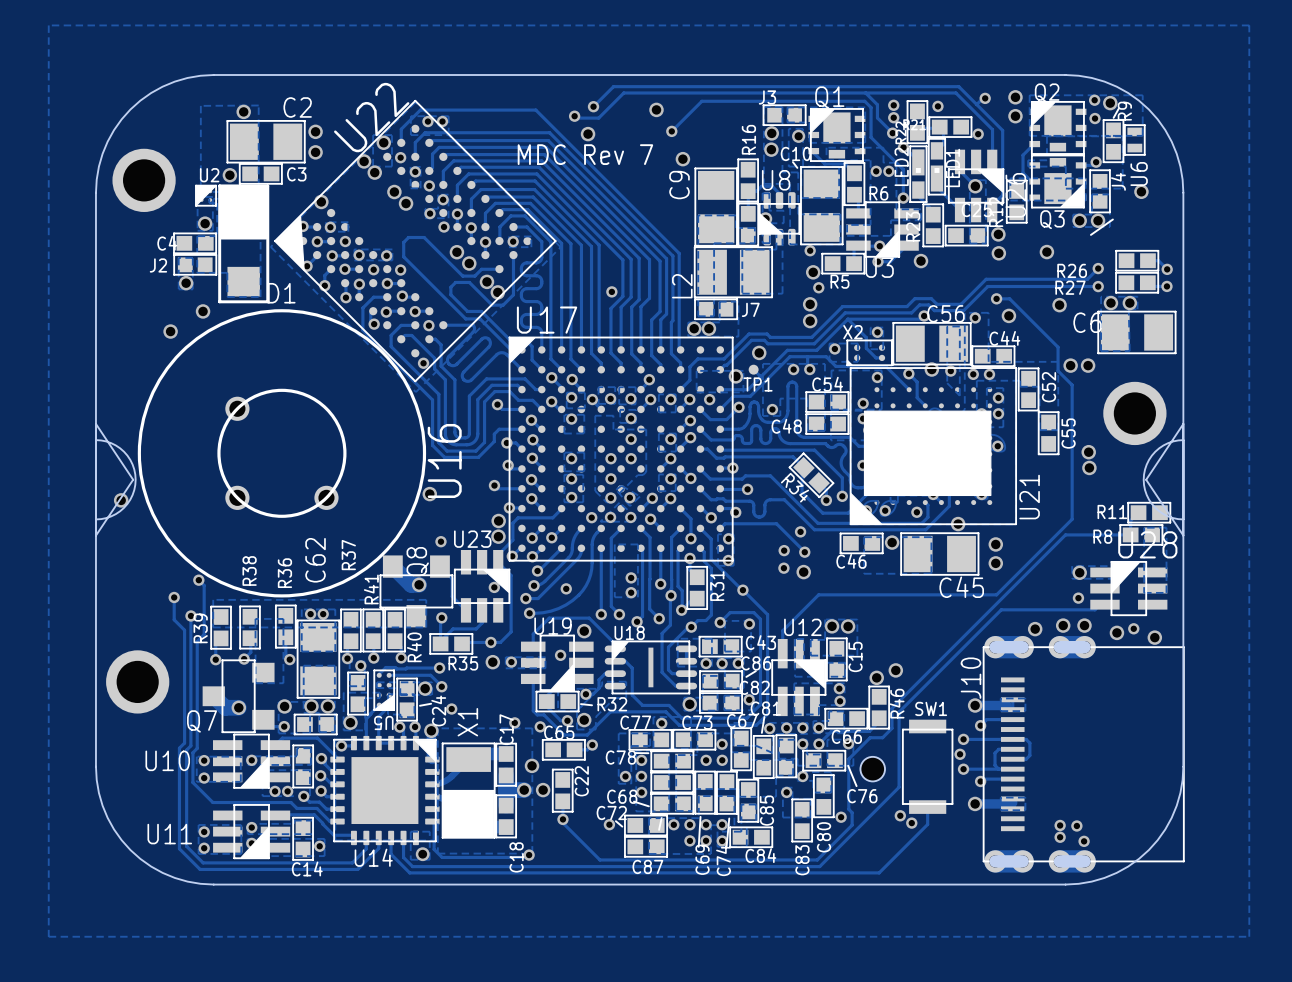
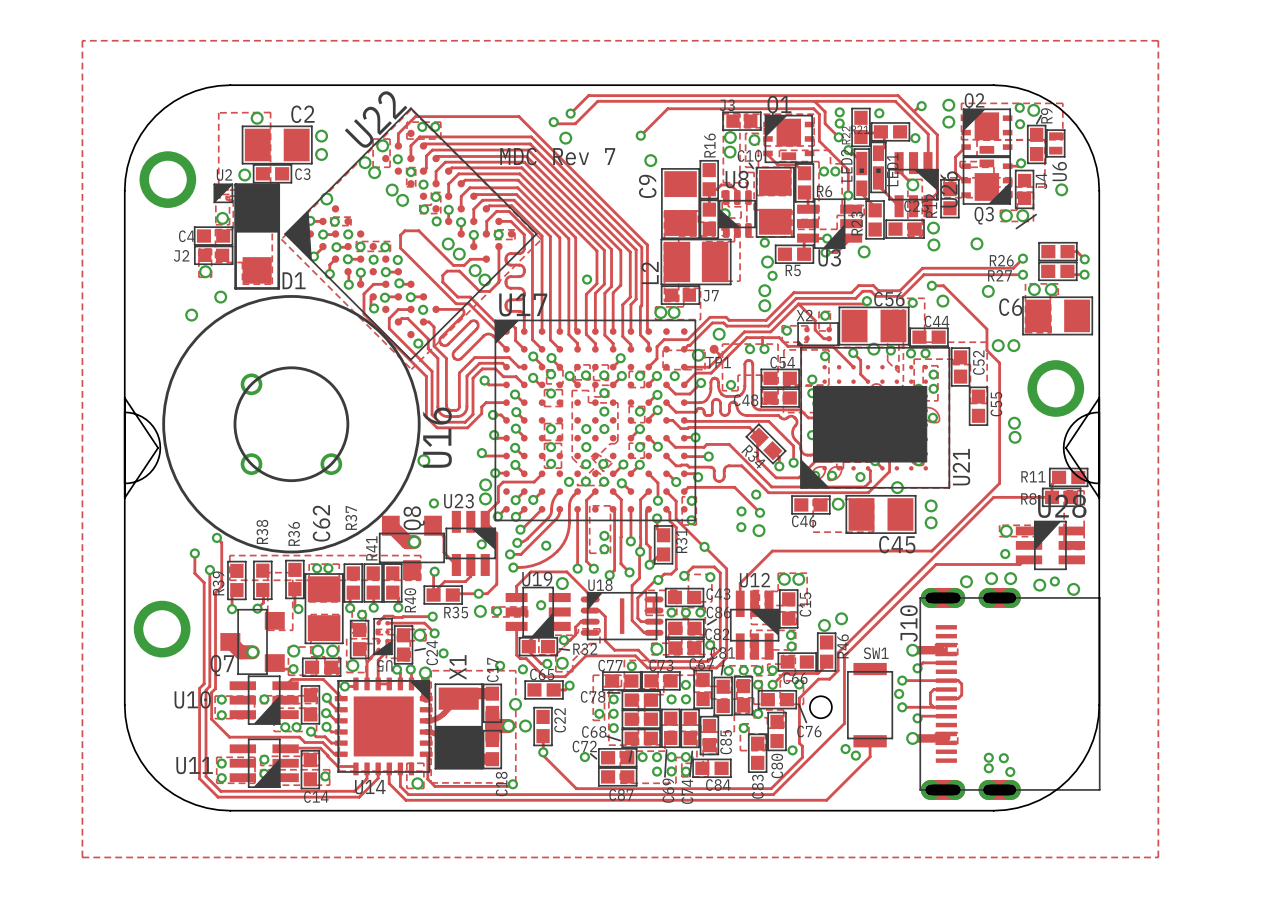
via: (656, 109) -> none
via: (121, 500) -> none

